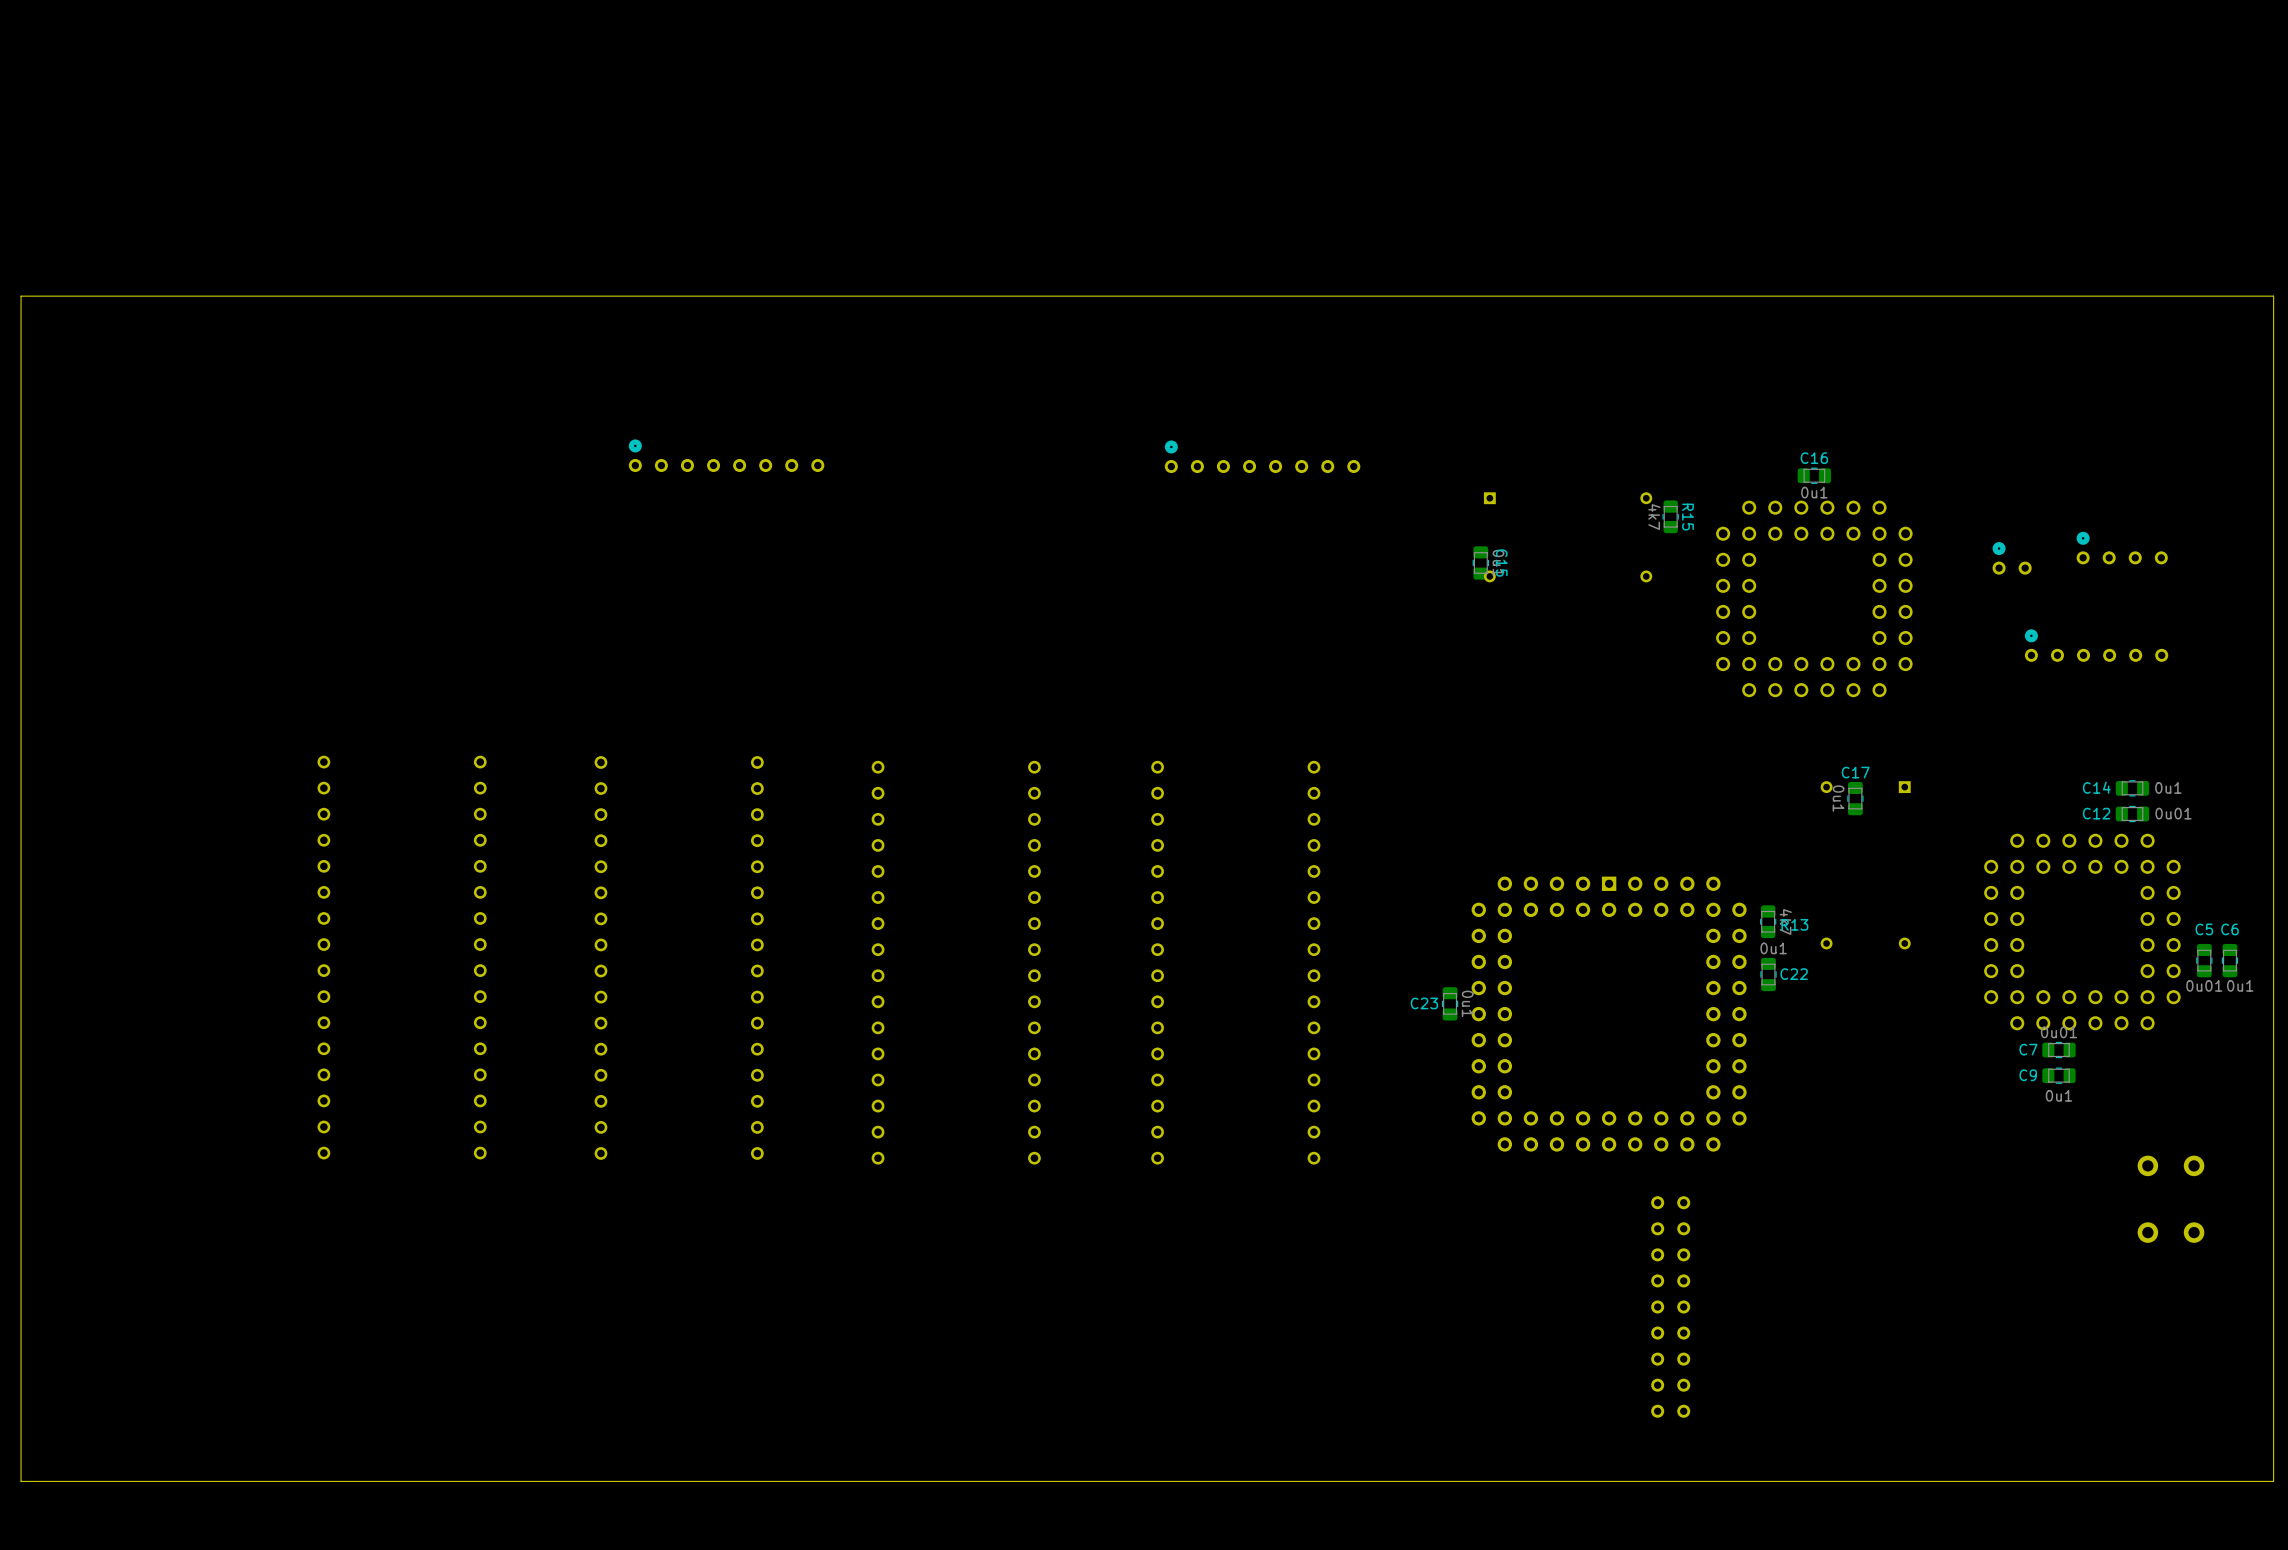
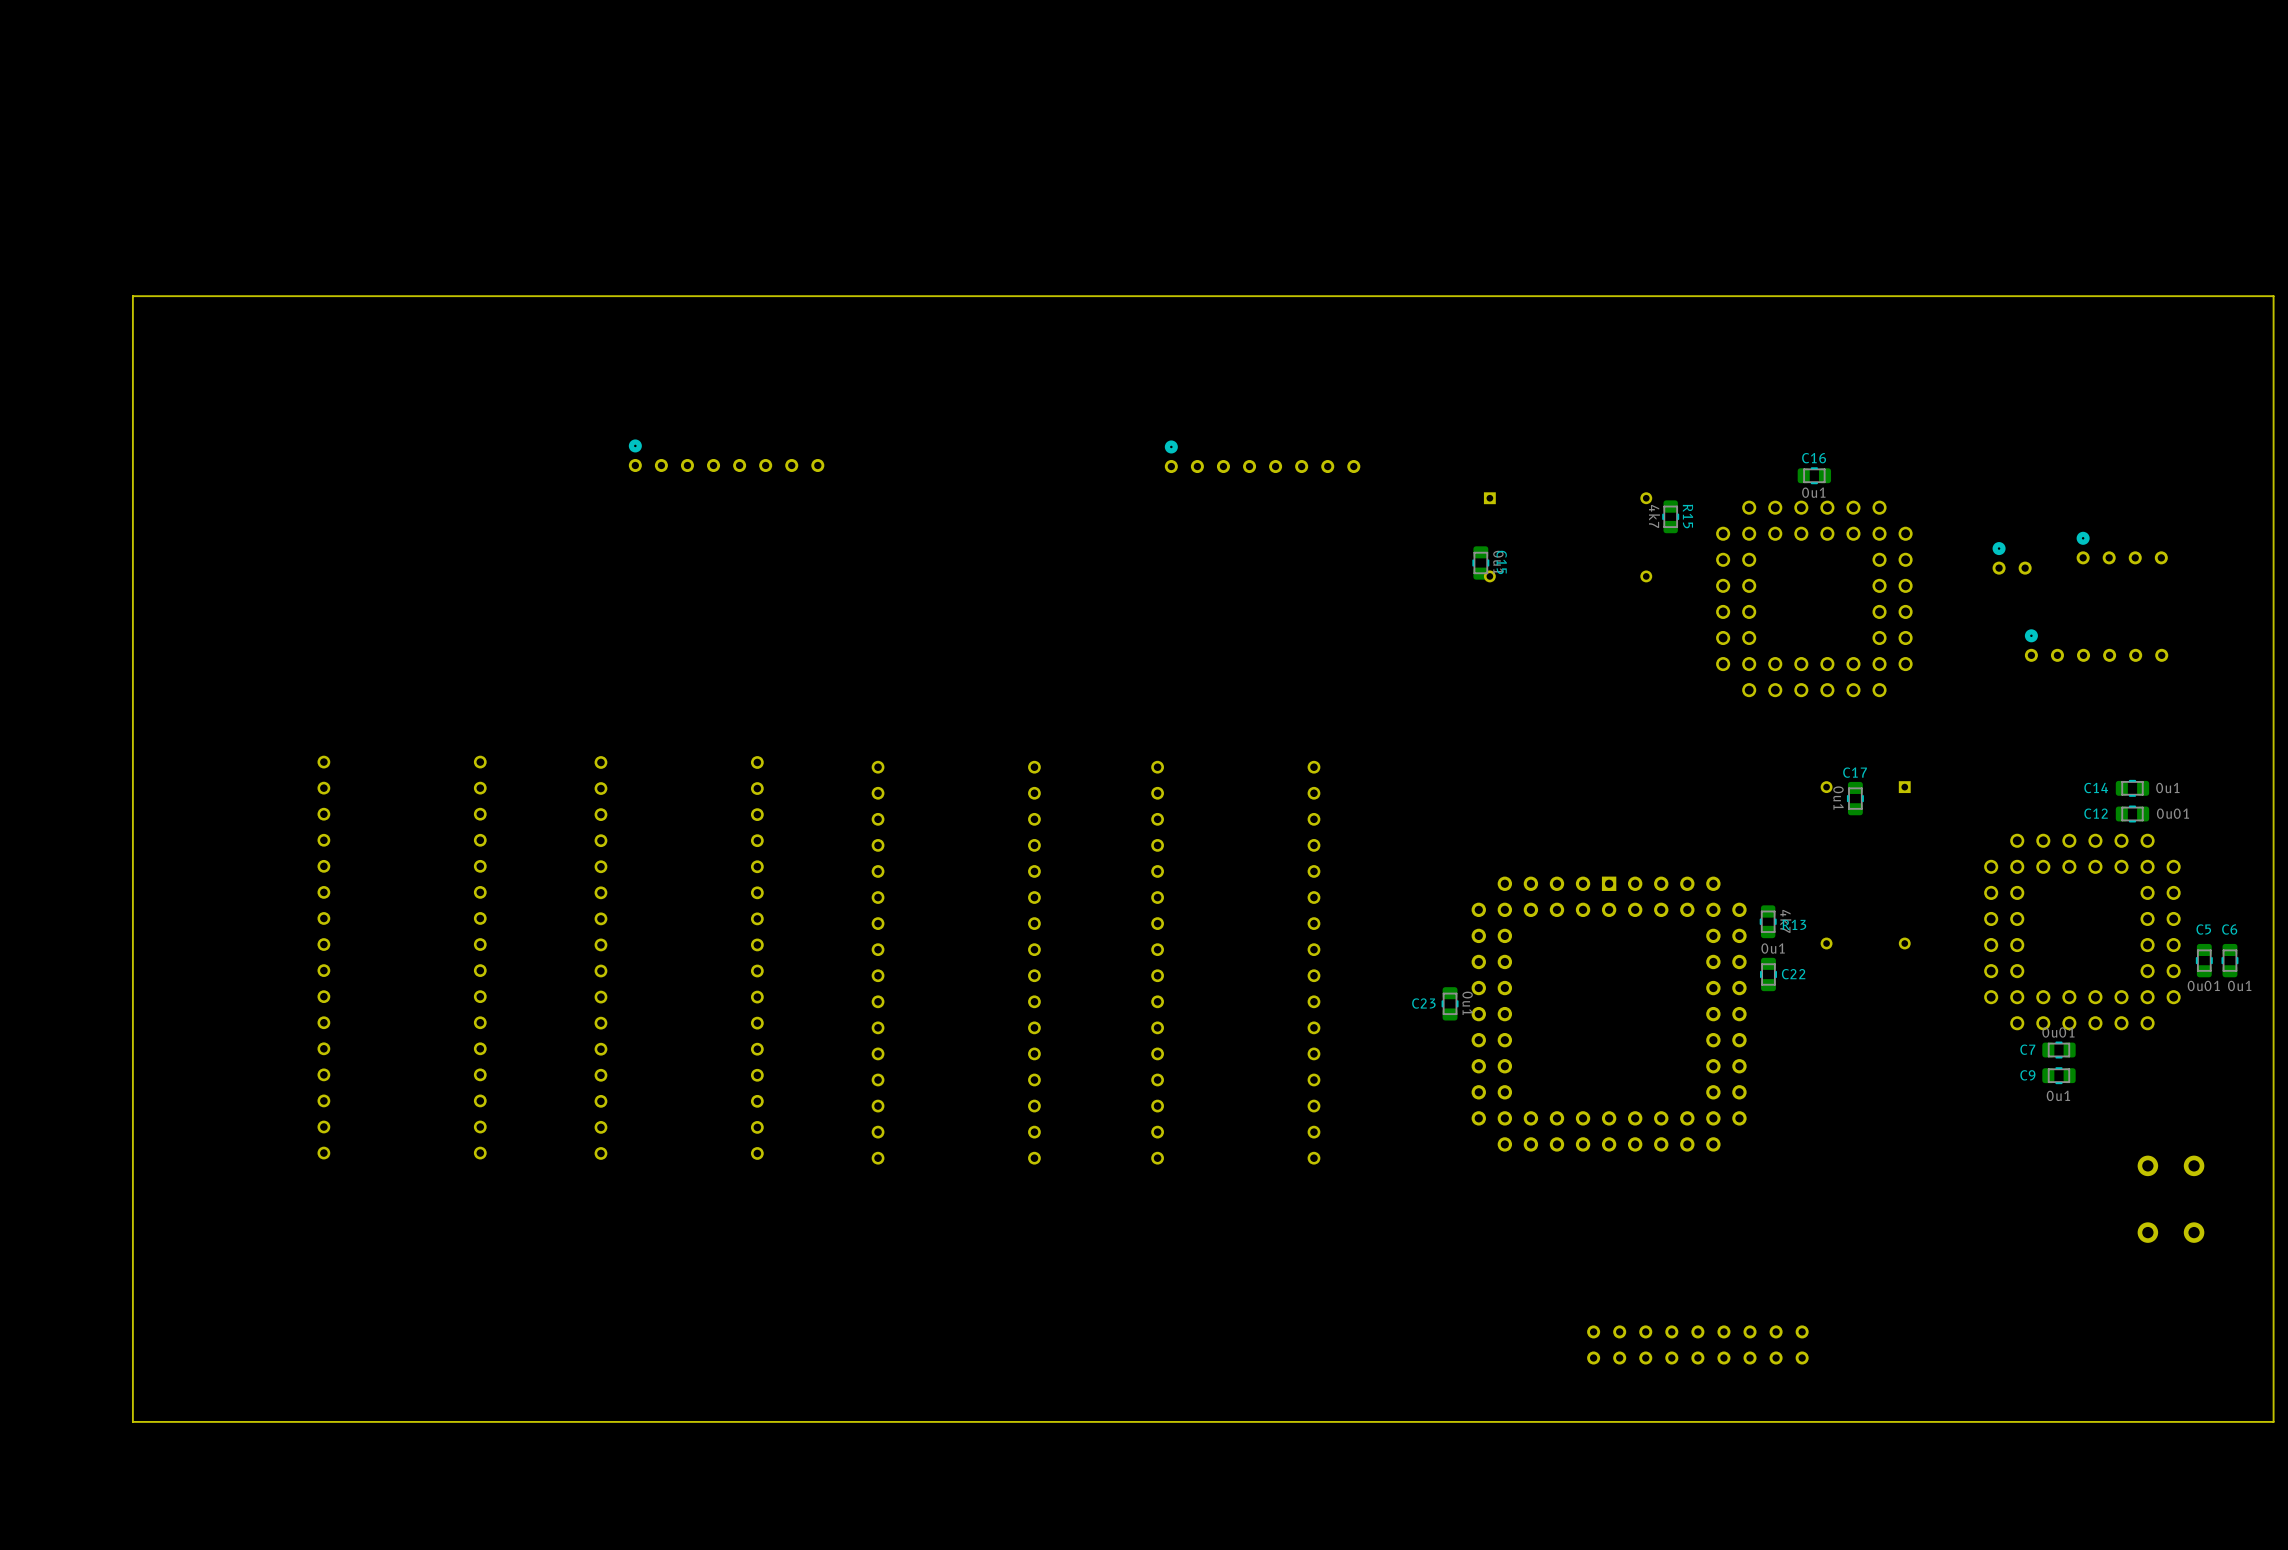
board edge: (132, 296) (21, 296) (21, 1481) (2273, 1481) (2273, 1421) -> (132, 296) (132, 1421) (2273, 1421)
part rotation: 0° (1670, 1306) -> 90° clockwise (1697, 1344)

